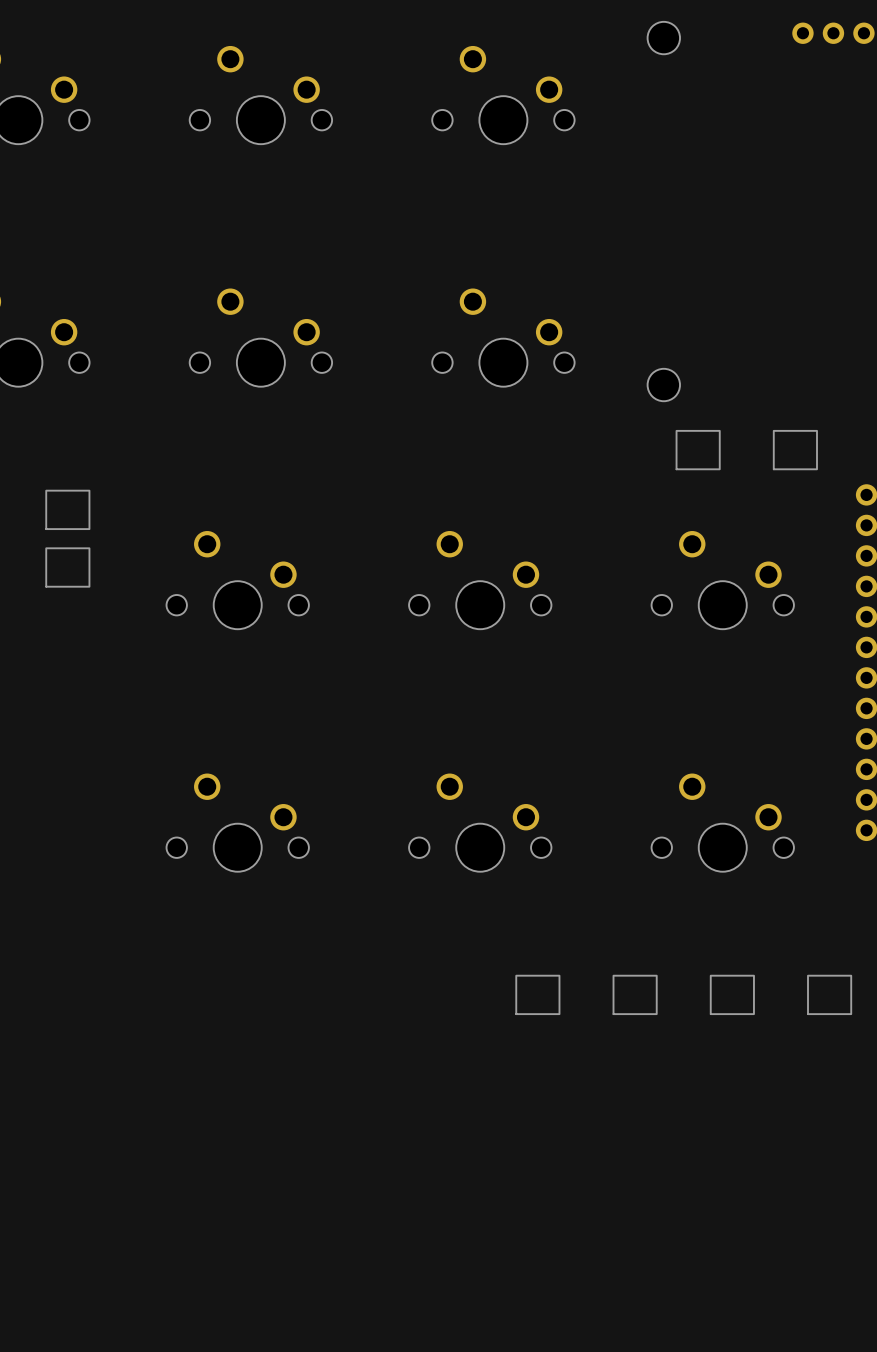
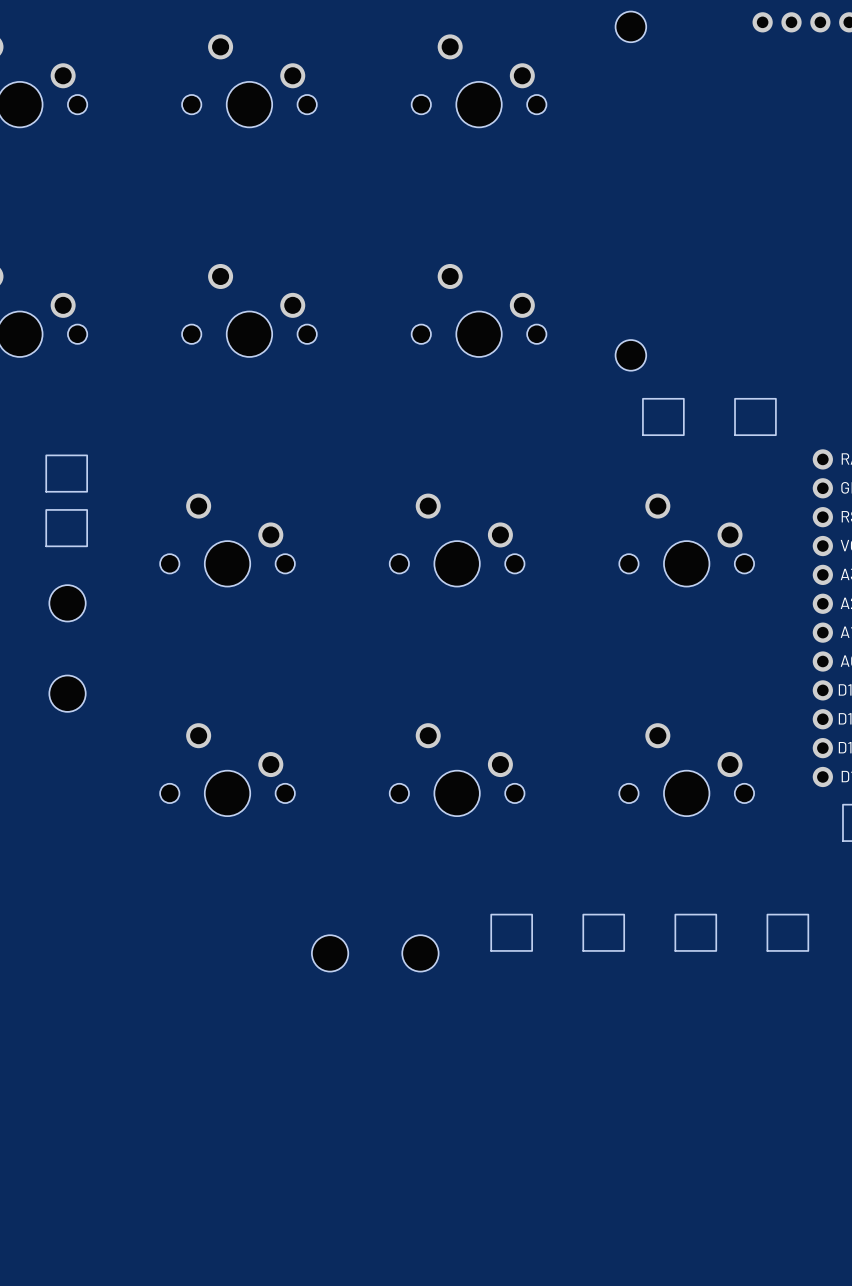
part: none -> (67, 603)
part: none -> (67, 693)
part: none -> (330, 953)
part: none -> (420, 953)

